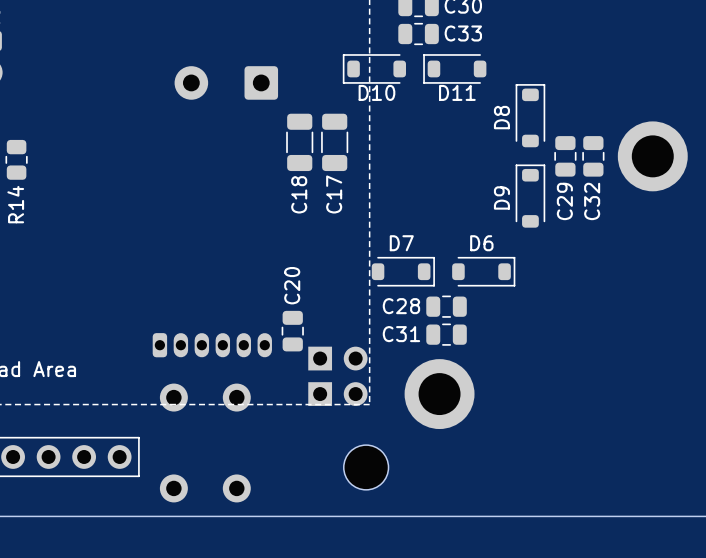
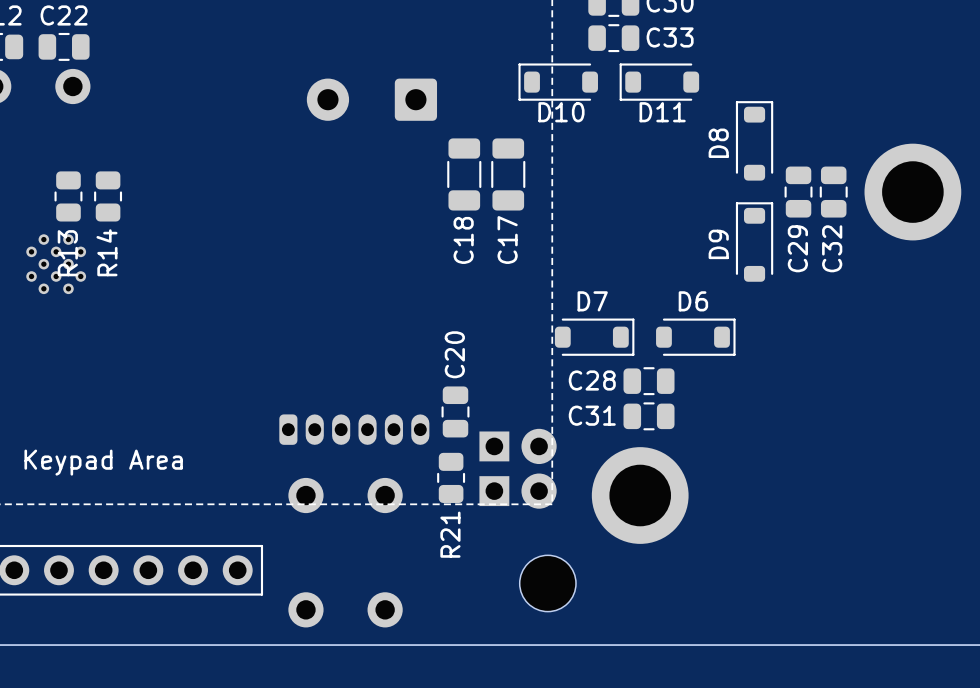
part footprint: [617, 121, 688, 192] -> [864, 143, 962, 241]
part footprint: [308, 346, 368, 406] -> [479, 428, 557, 509]
part footprint: [404, 359, 475, 430] -> [591, 447, 689, 544]
R21: none -> (451, 477)

